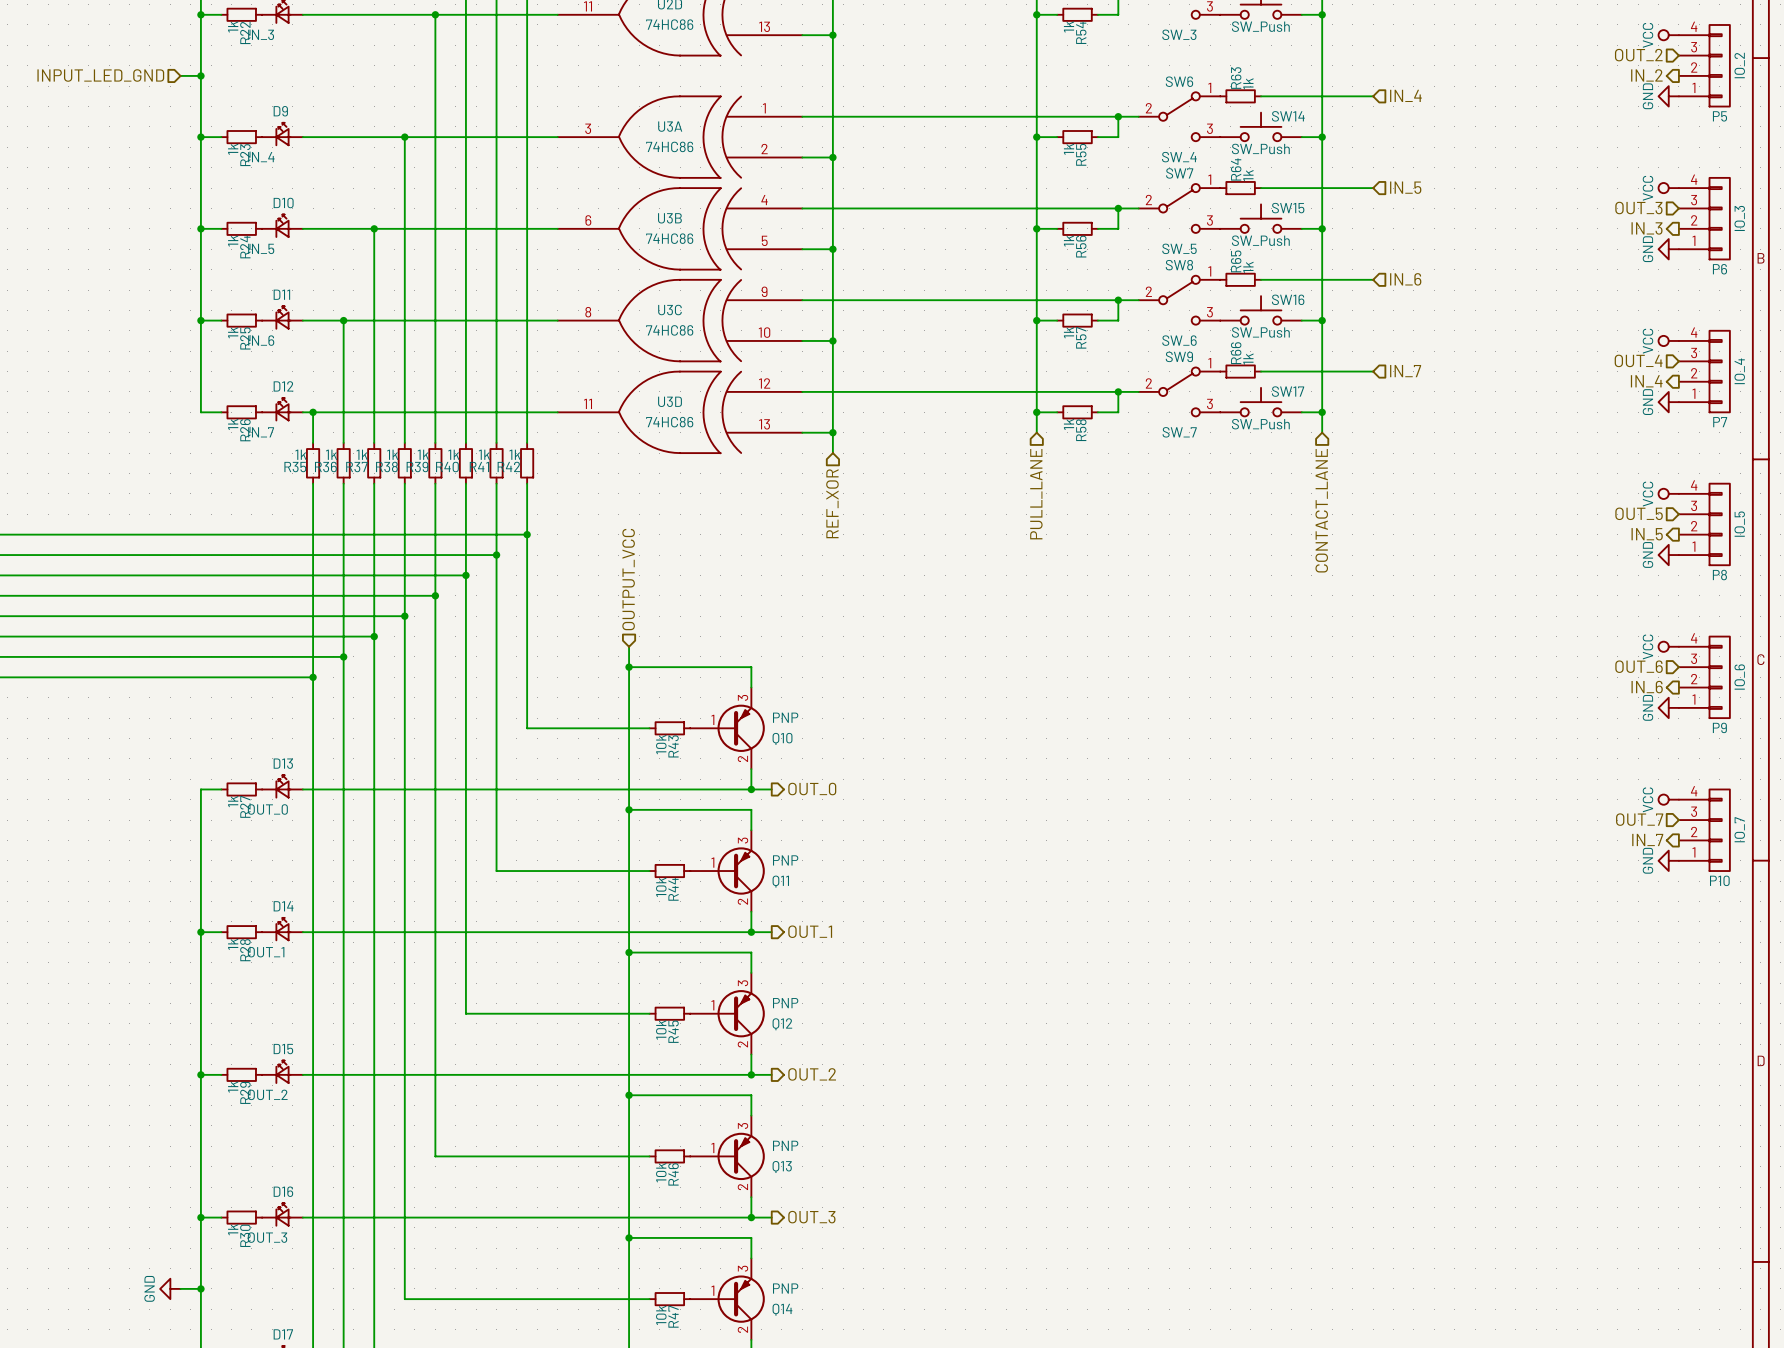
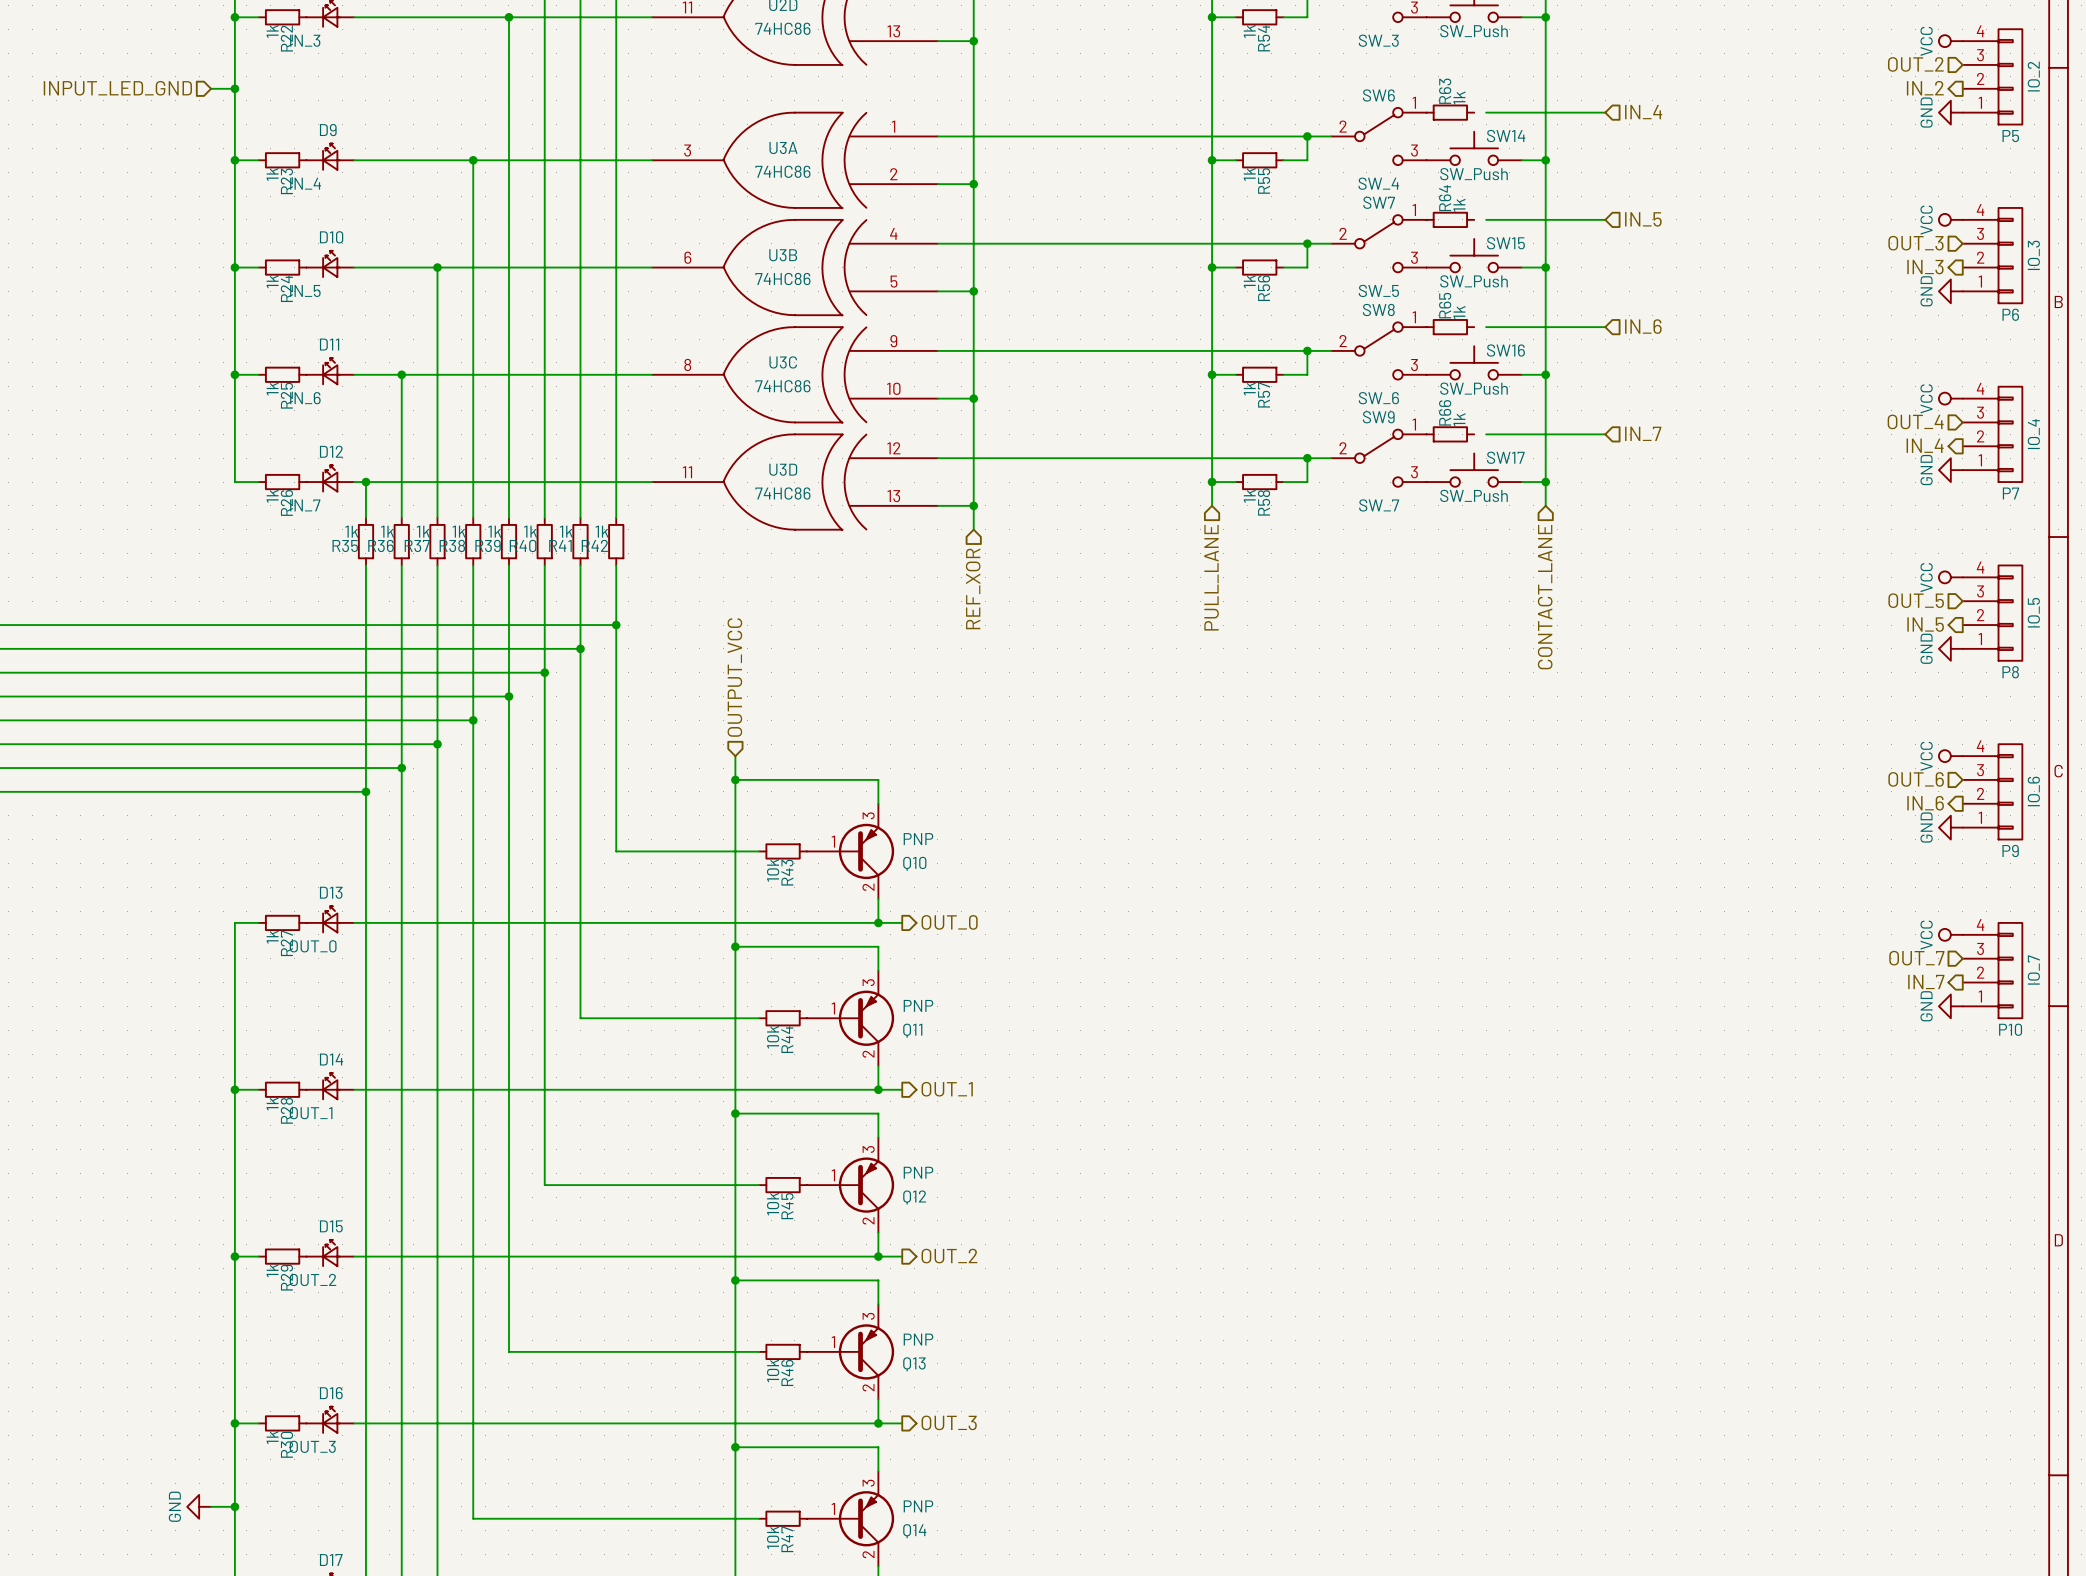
wire: (1261, 96) (1271, 96) -> none
wire: (1261, 188) (1271, 188) -> none
wire: (1261, 279) (1271, 279) -> none
wire: (1261, 371) (1271, 371) -> none

